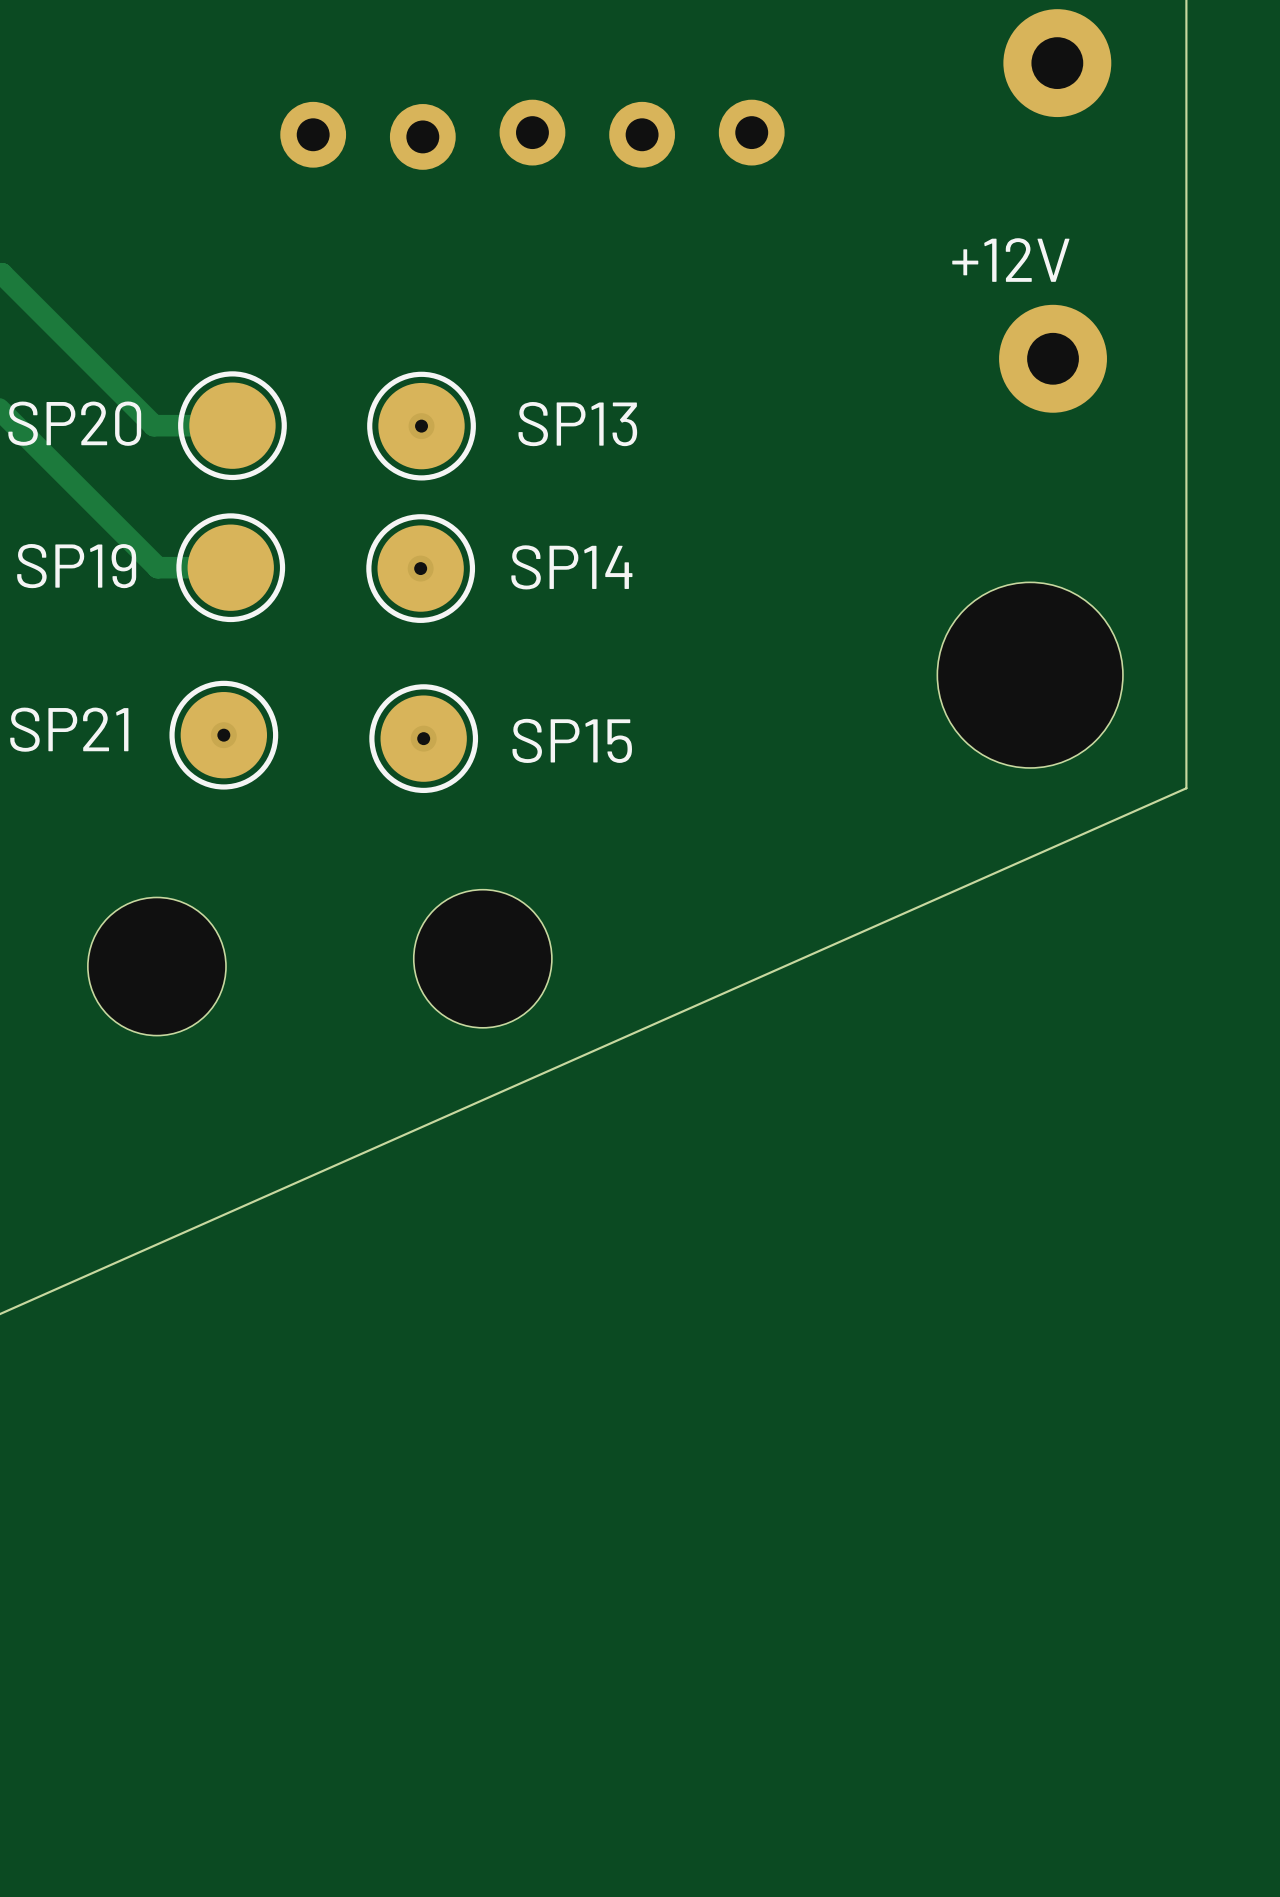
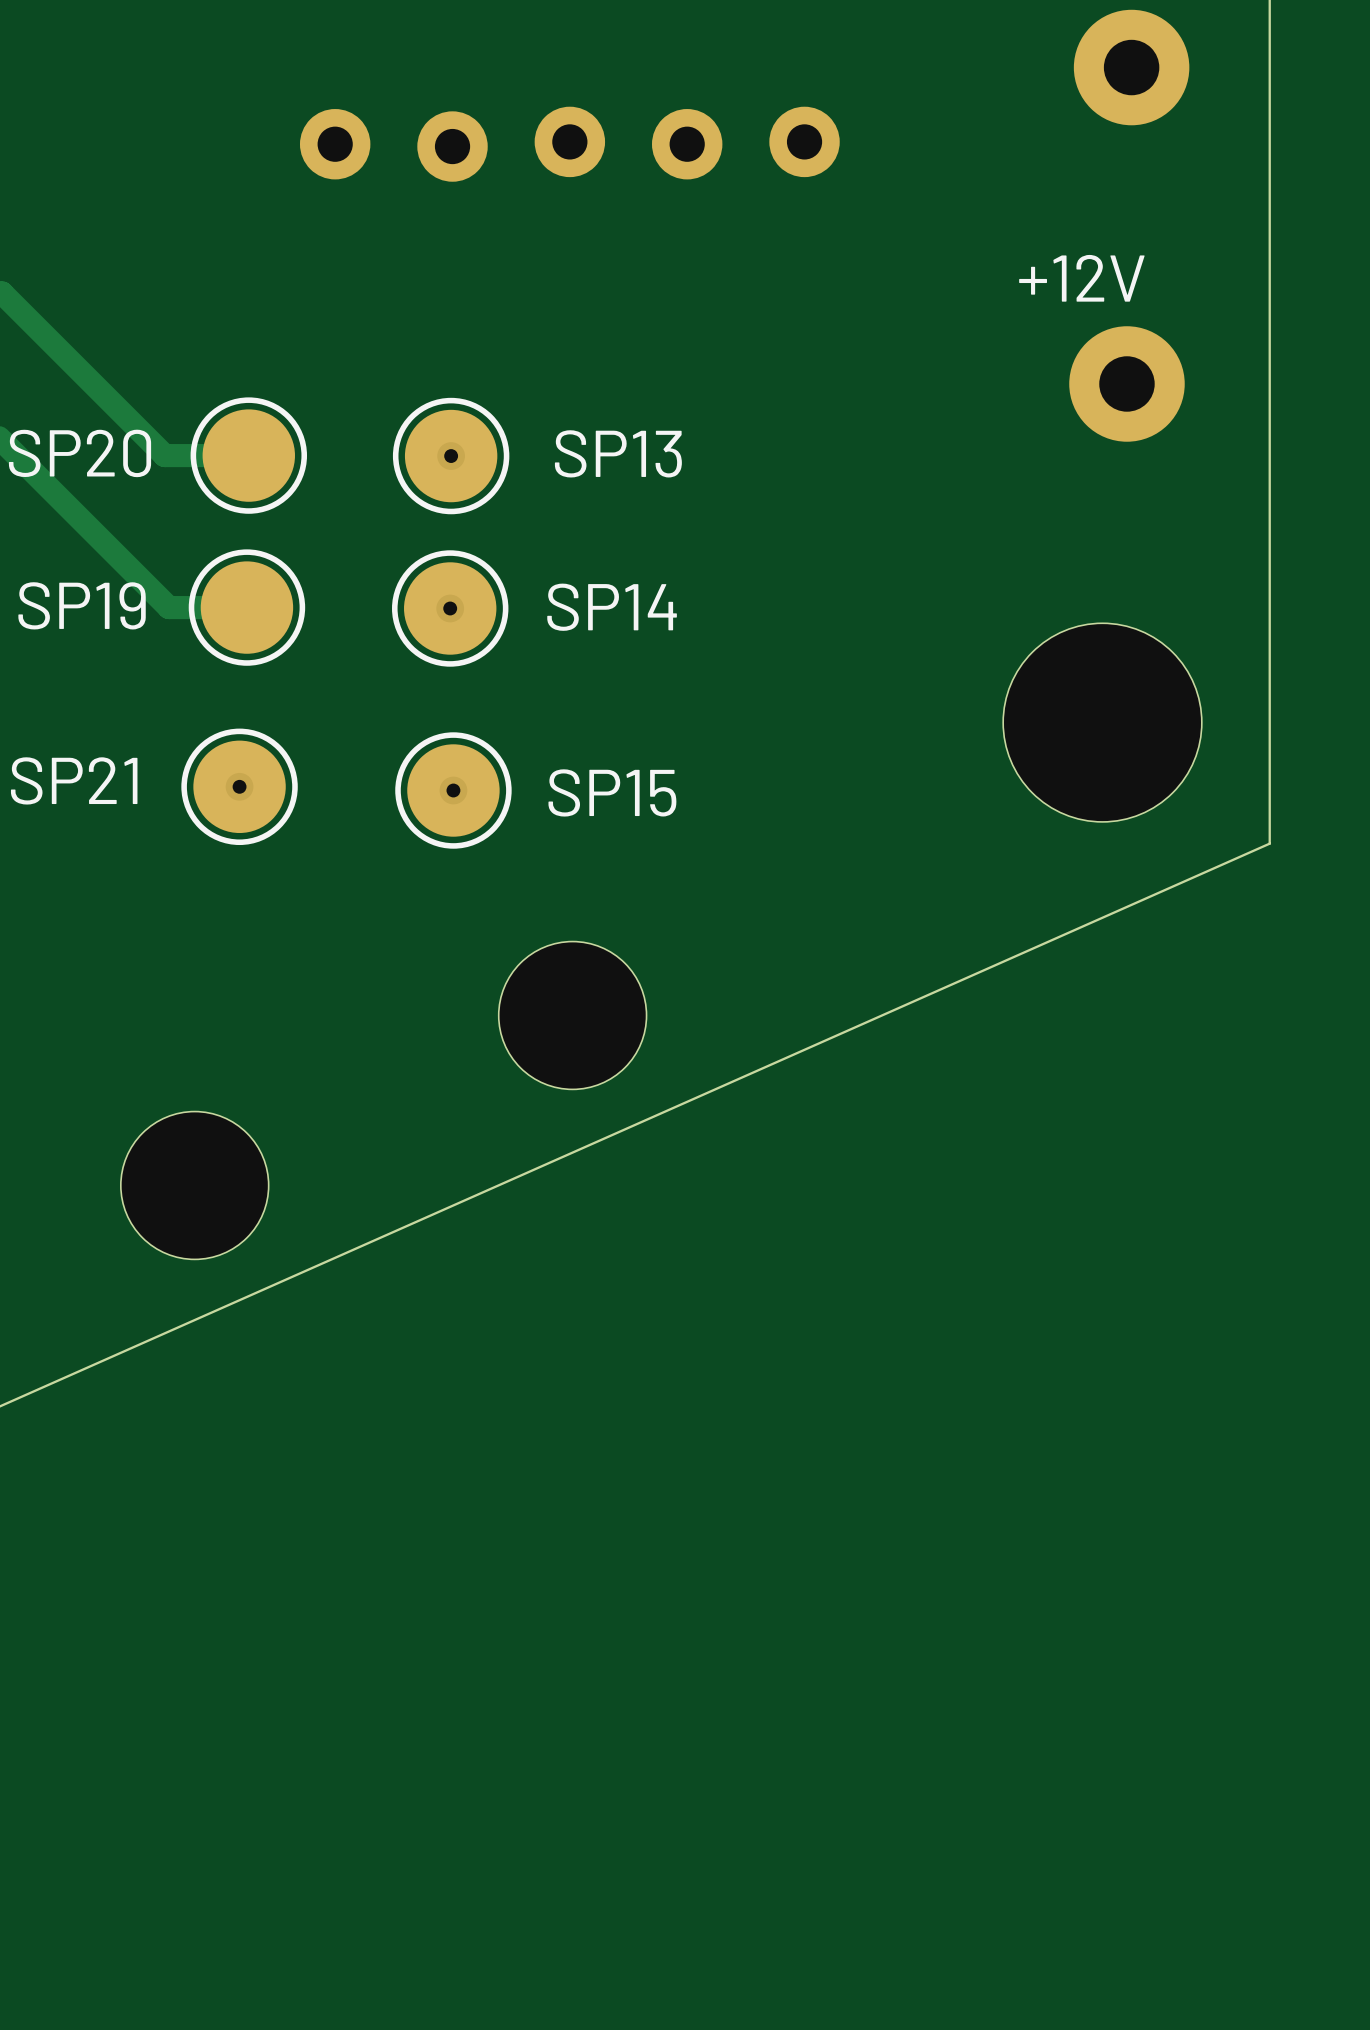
part position: (482, 958) -> (572, 1015)
part position: (156, 966) -> (194, 1185)

